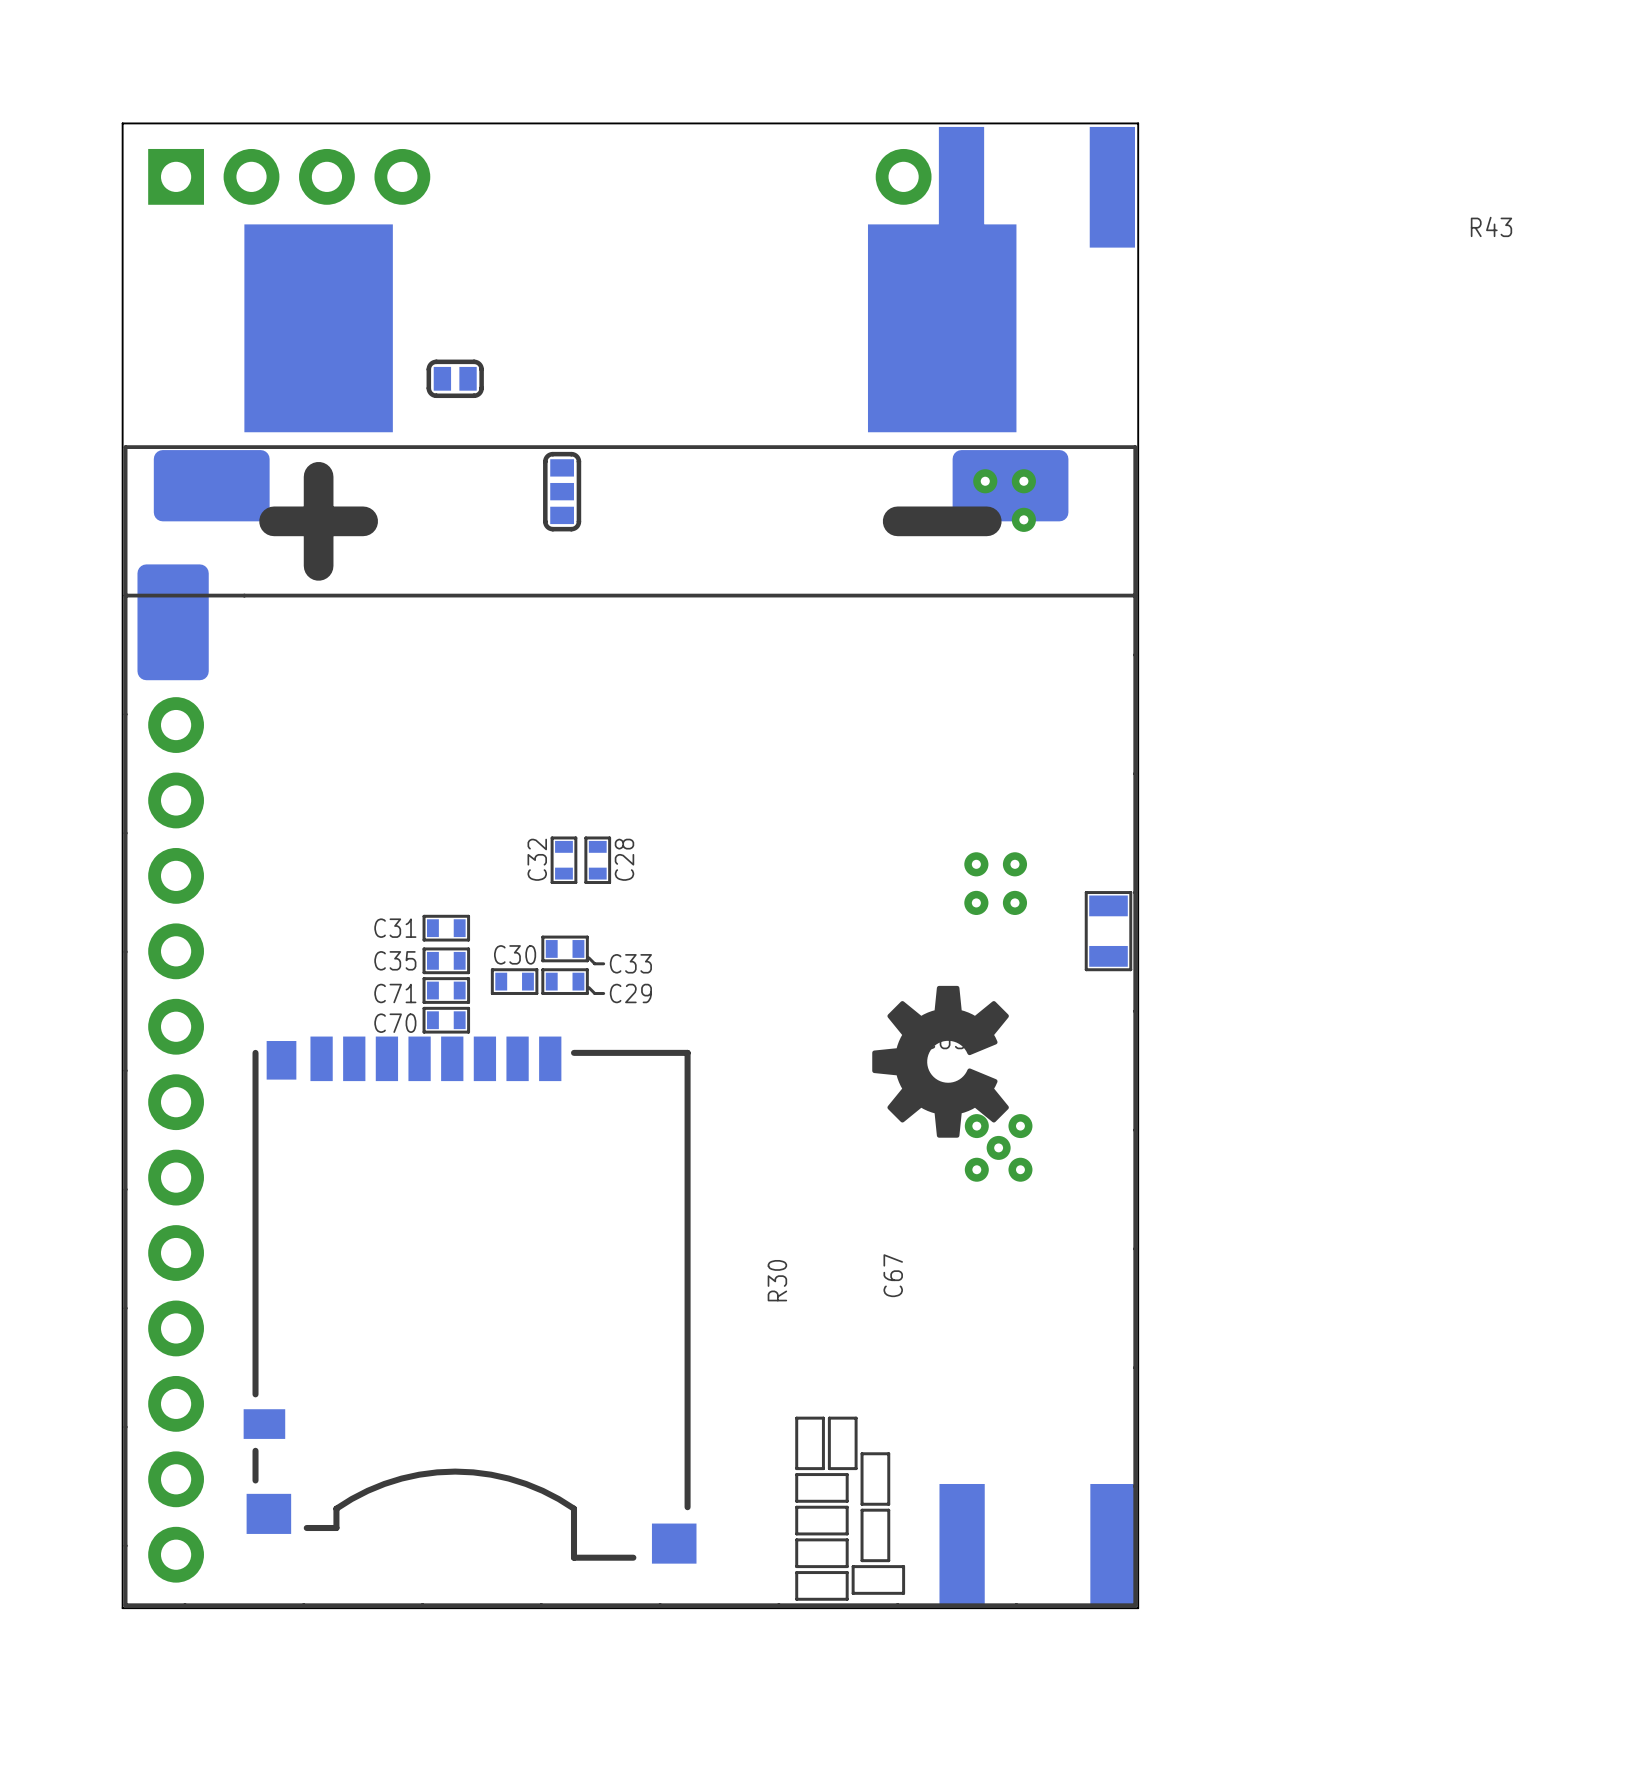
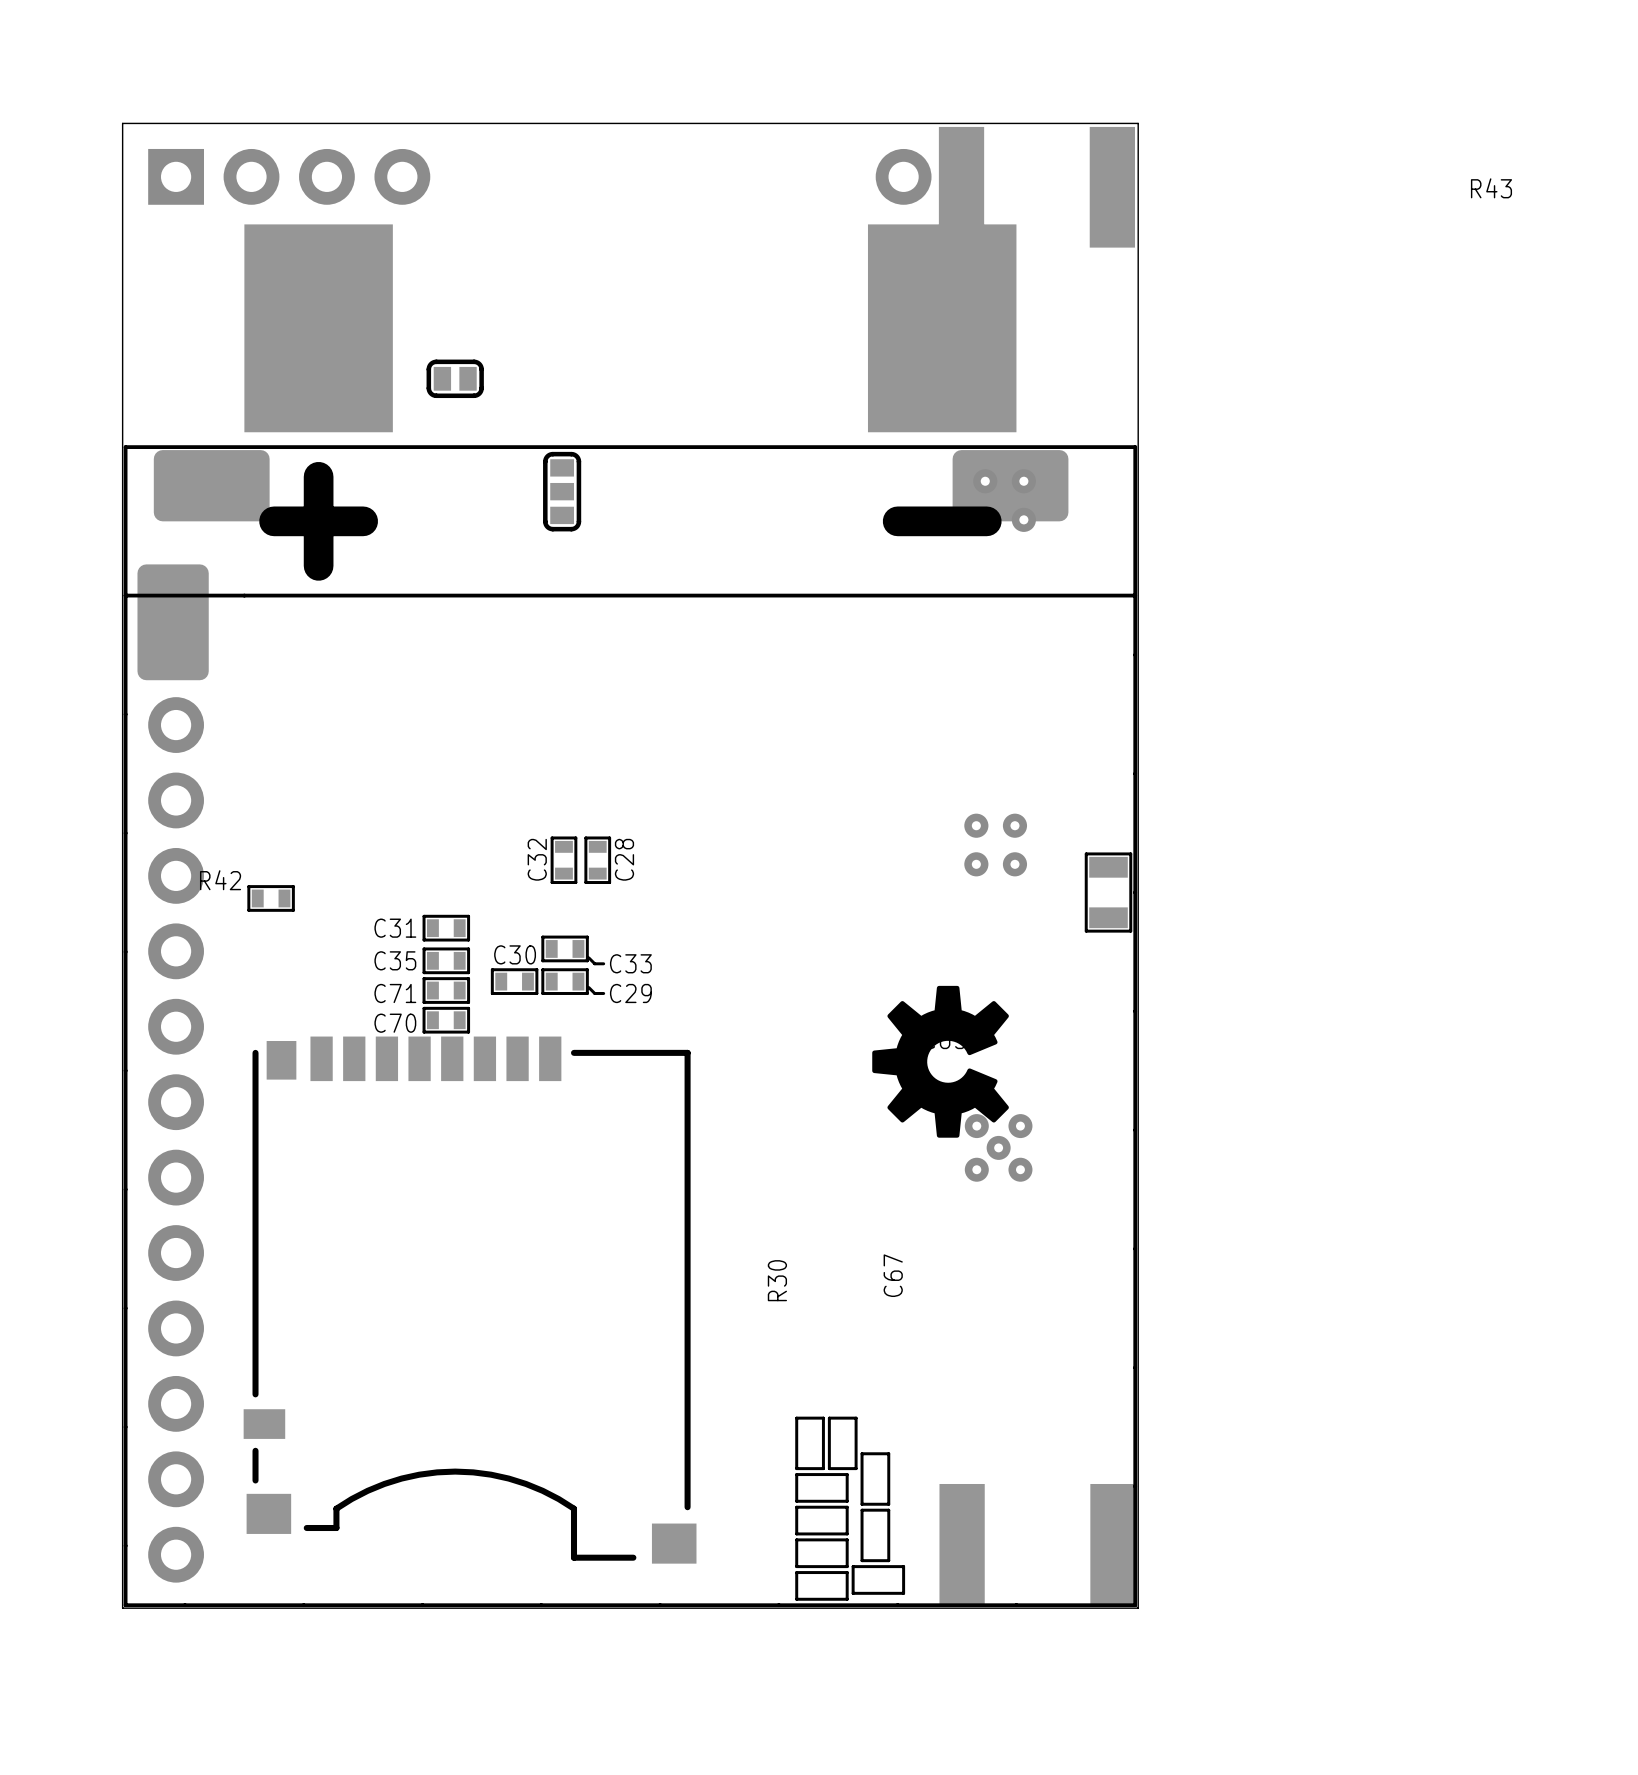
part position: (995, 883) -> (995, 845)
R42: none -> (271, 898)
R43 position: (1108, 931) -> (1108, 892)

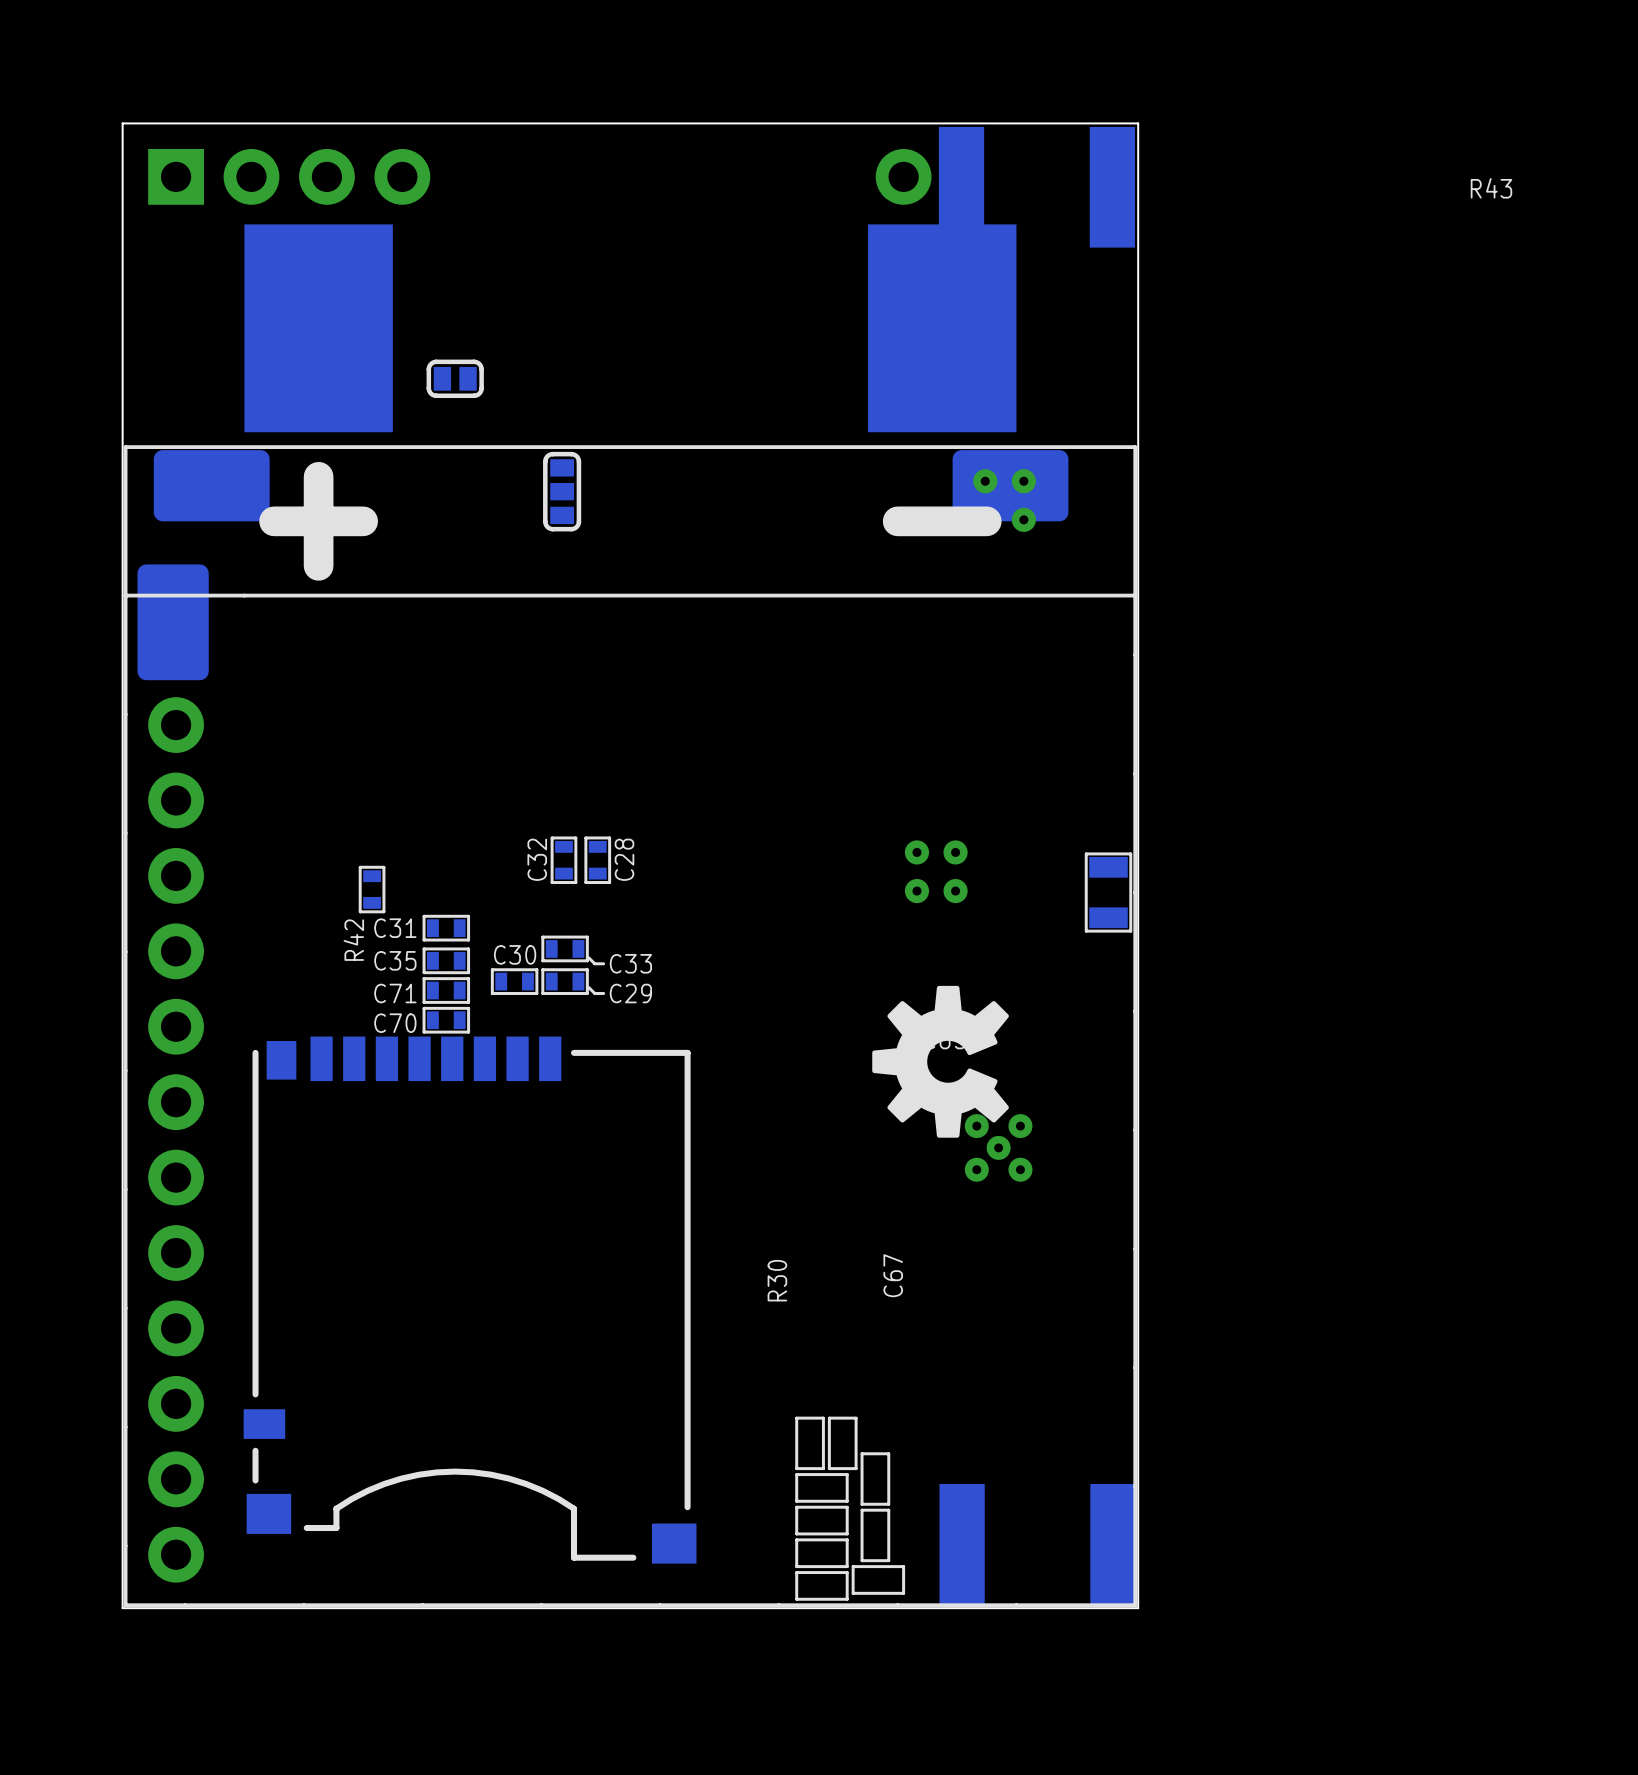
part position: (995, 845) -> (936, 871)
R42 name position: R42 (220, 880) -> R42 (353, 940)
R42 rotation: 0° (271, 898) -> 90° clockwise (372, 889)
R42 position: (271, 898) -> (372, 889)

